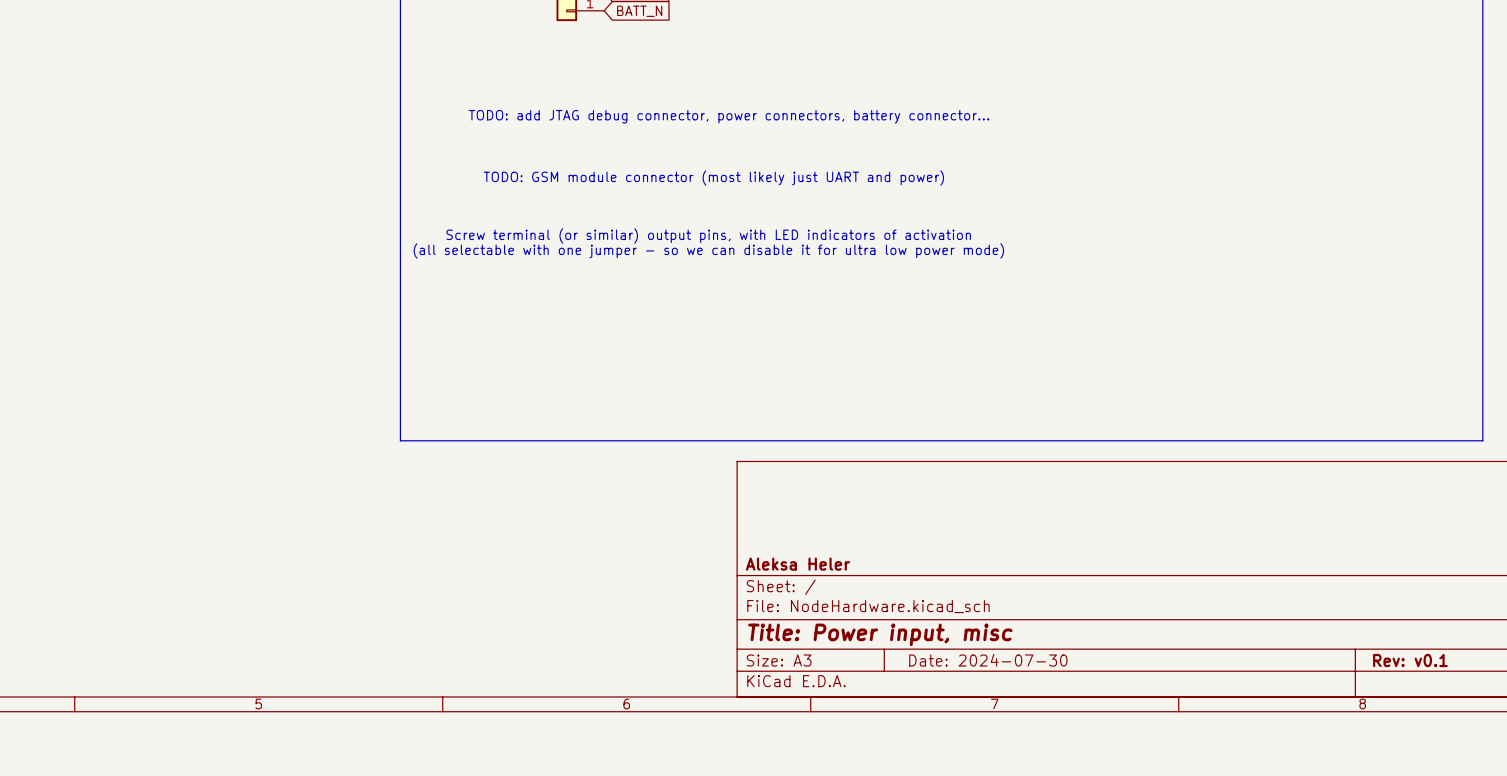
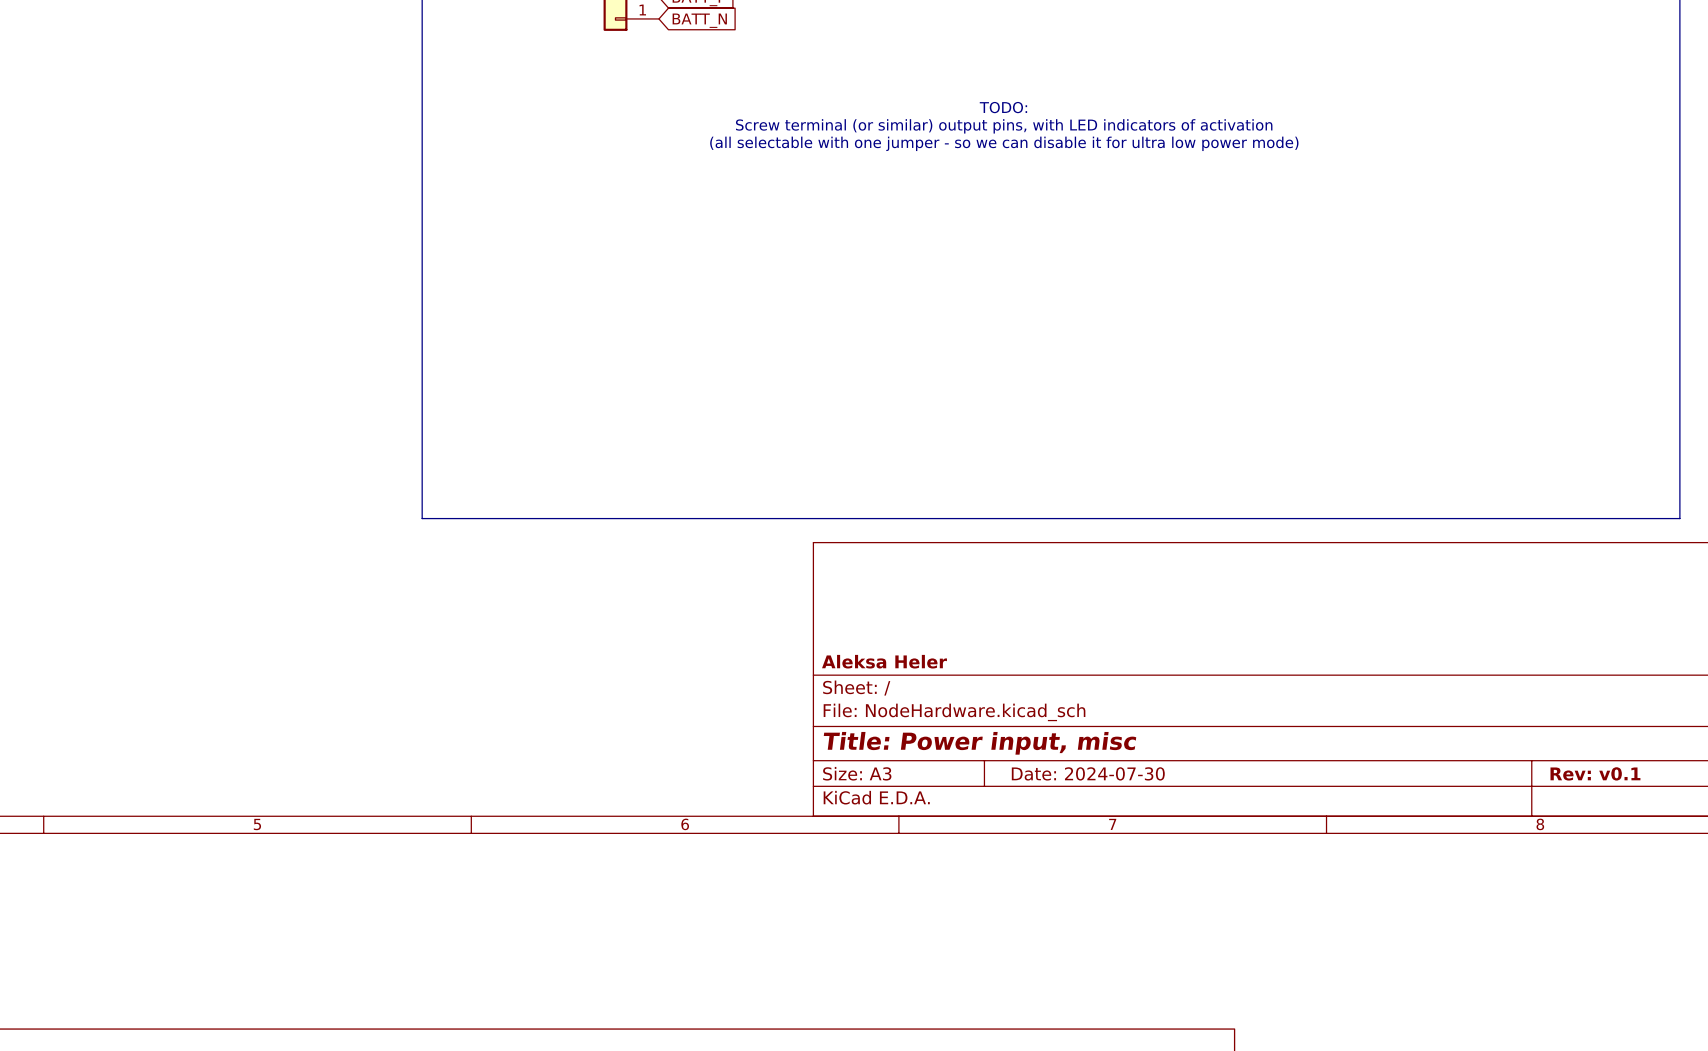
text: none -> TODO: (1003, 107)
text: none -> Screw terminal (or similar) output pins, with LED indicators of activation (1004, 126)
text: TODO: add JTAG debug connector, power connectors, battery connector... (729, 116) -> none
text: none -> (all selectable with one jumper - so we can disable it for ultra low power mode) (1004, 143)
text: TODO: GSM module connector (most likely just UART and power) (713, 178) -> none
text: Screw terminal (or similar) output pins, with LED indicators of activation (708, 235) -> none
text: (all selectable with one jumper - so we can disable it for ultra low power mode) (708, 250) -> none

